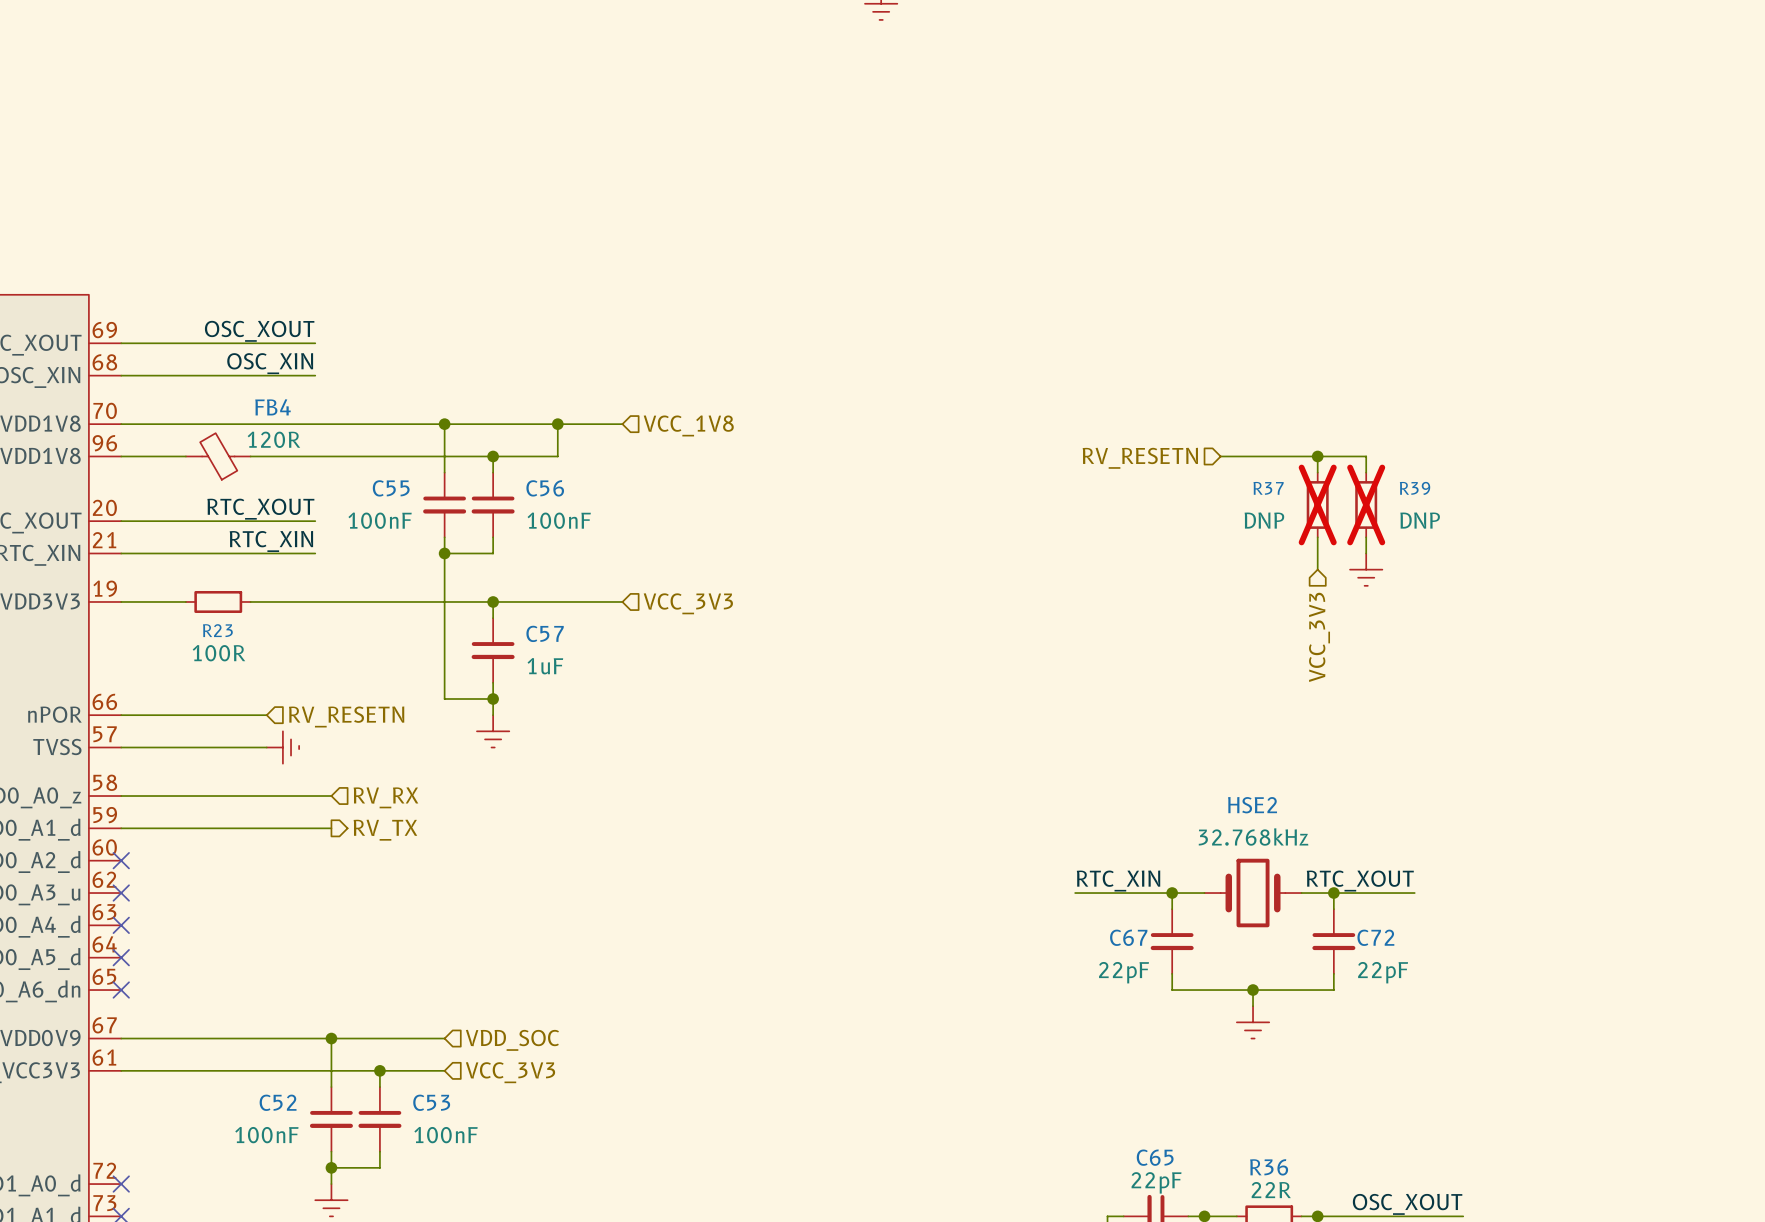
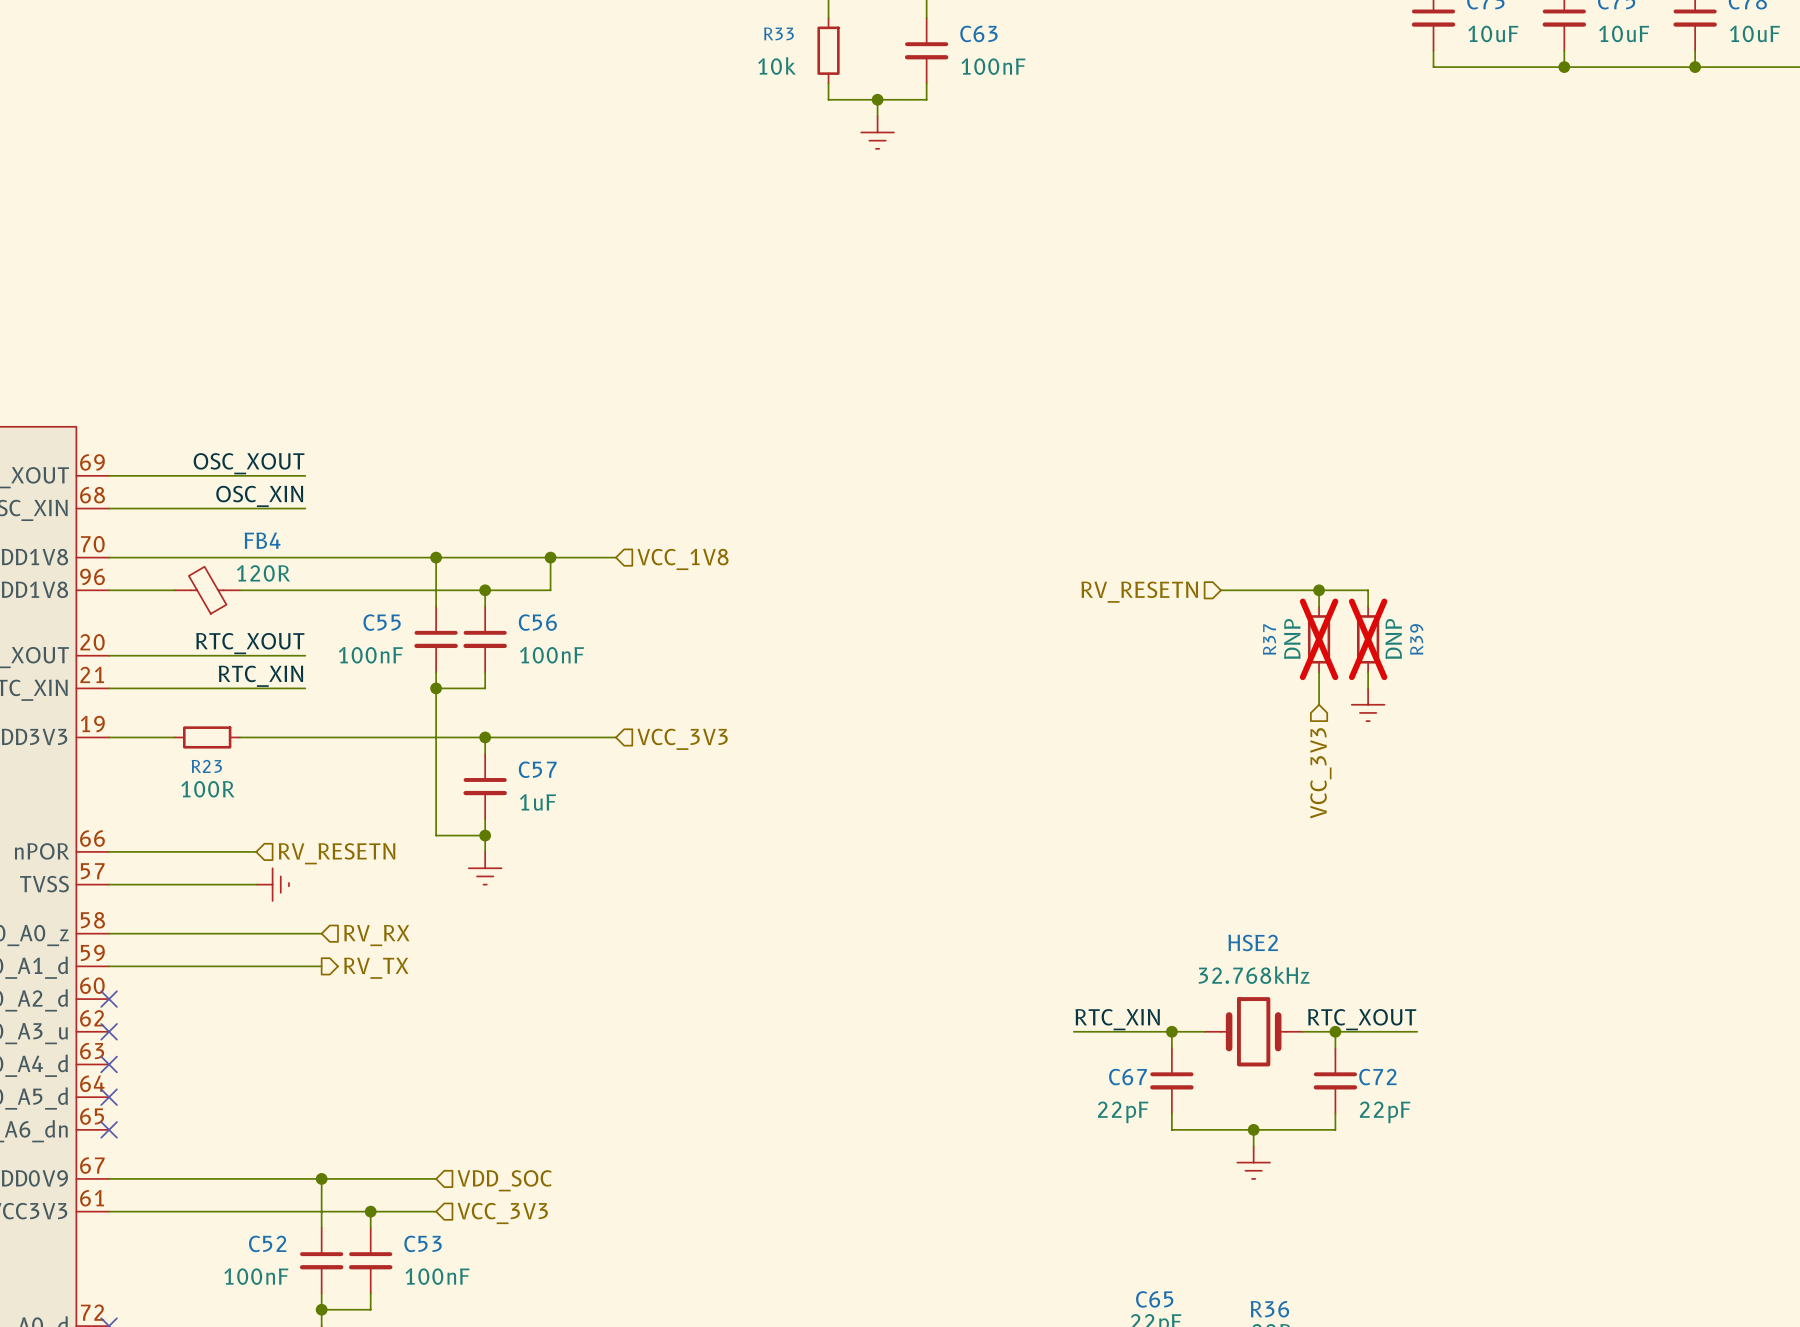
R37 name rotation: 0° (1268, 488) -> 90° counterclockwise (1269, 639)
R39 name rotation: 0° (1415, 488) -> 90° counterclockwise (1416, 639)
R37 value rotation: 0° (1264, 520) -> 90° counterclockwise (1292, 639)
R39 value rotation: 0° (1420, 520) -> 90° counterclockwise (1393, 639)

